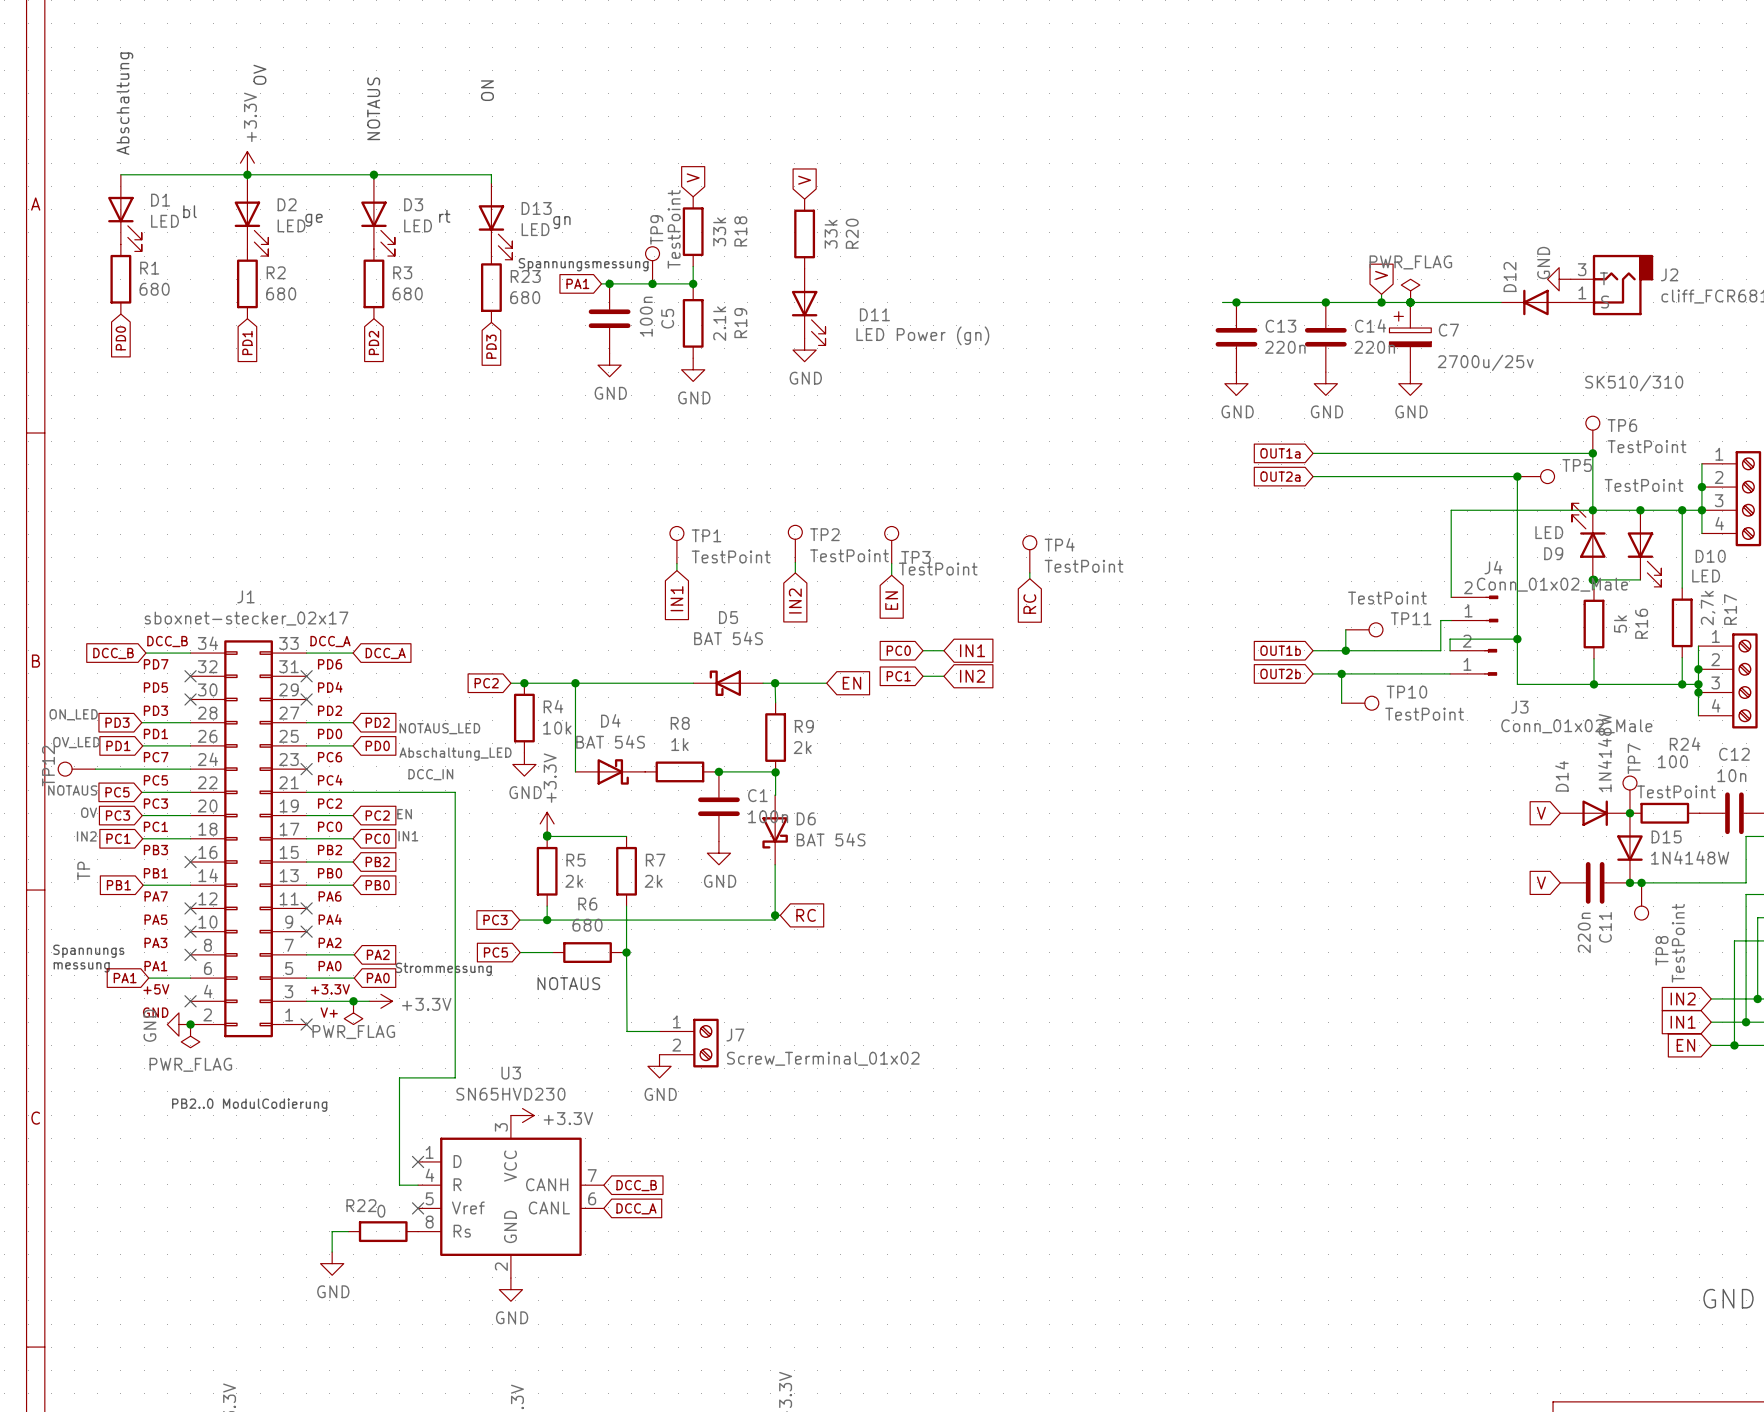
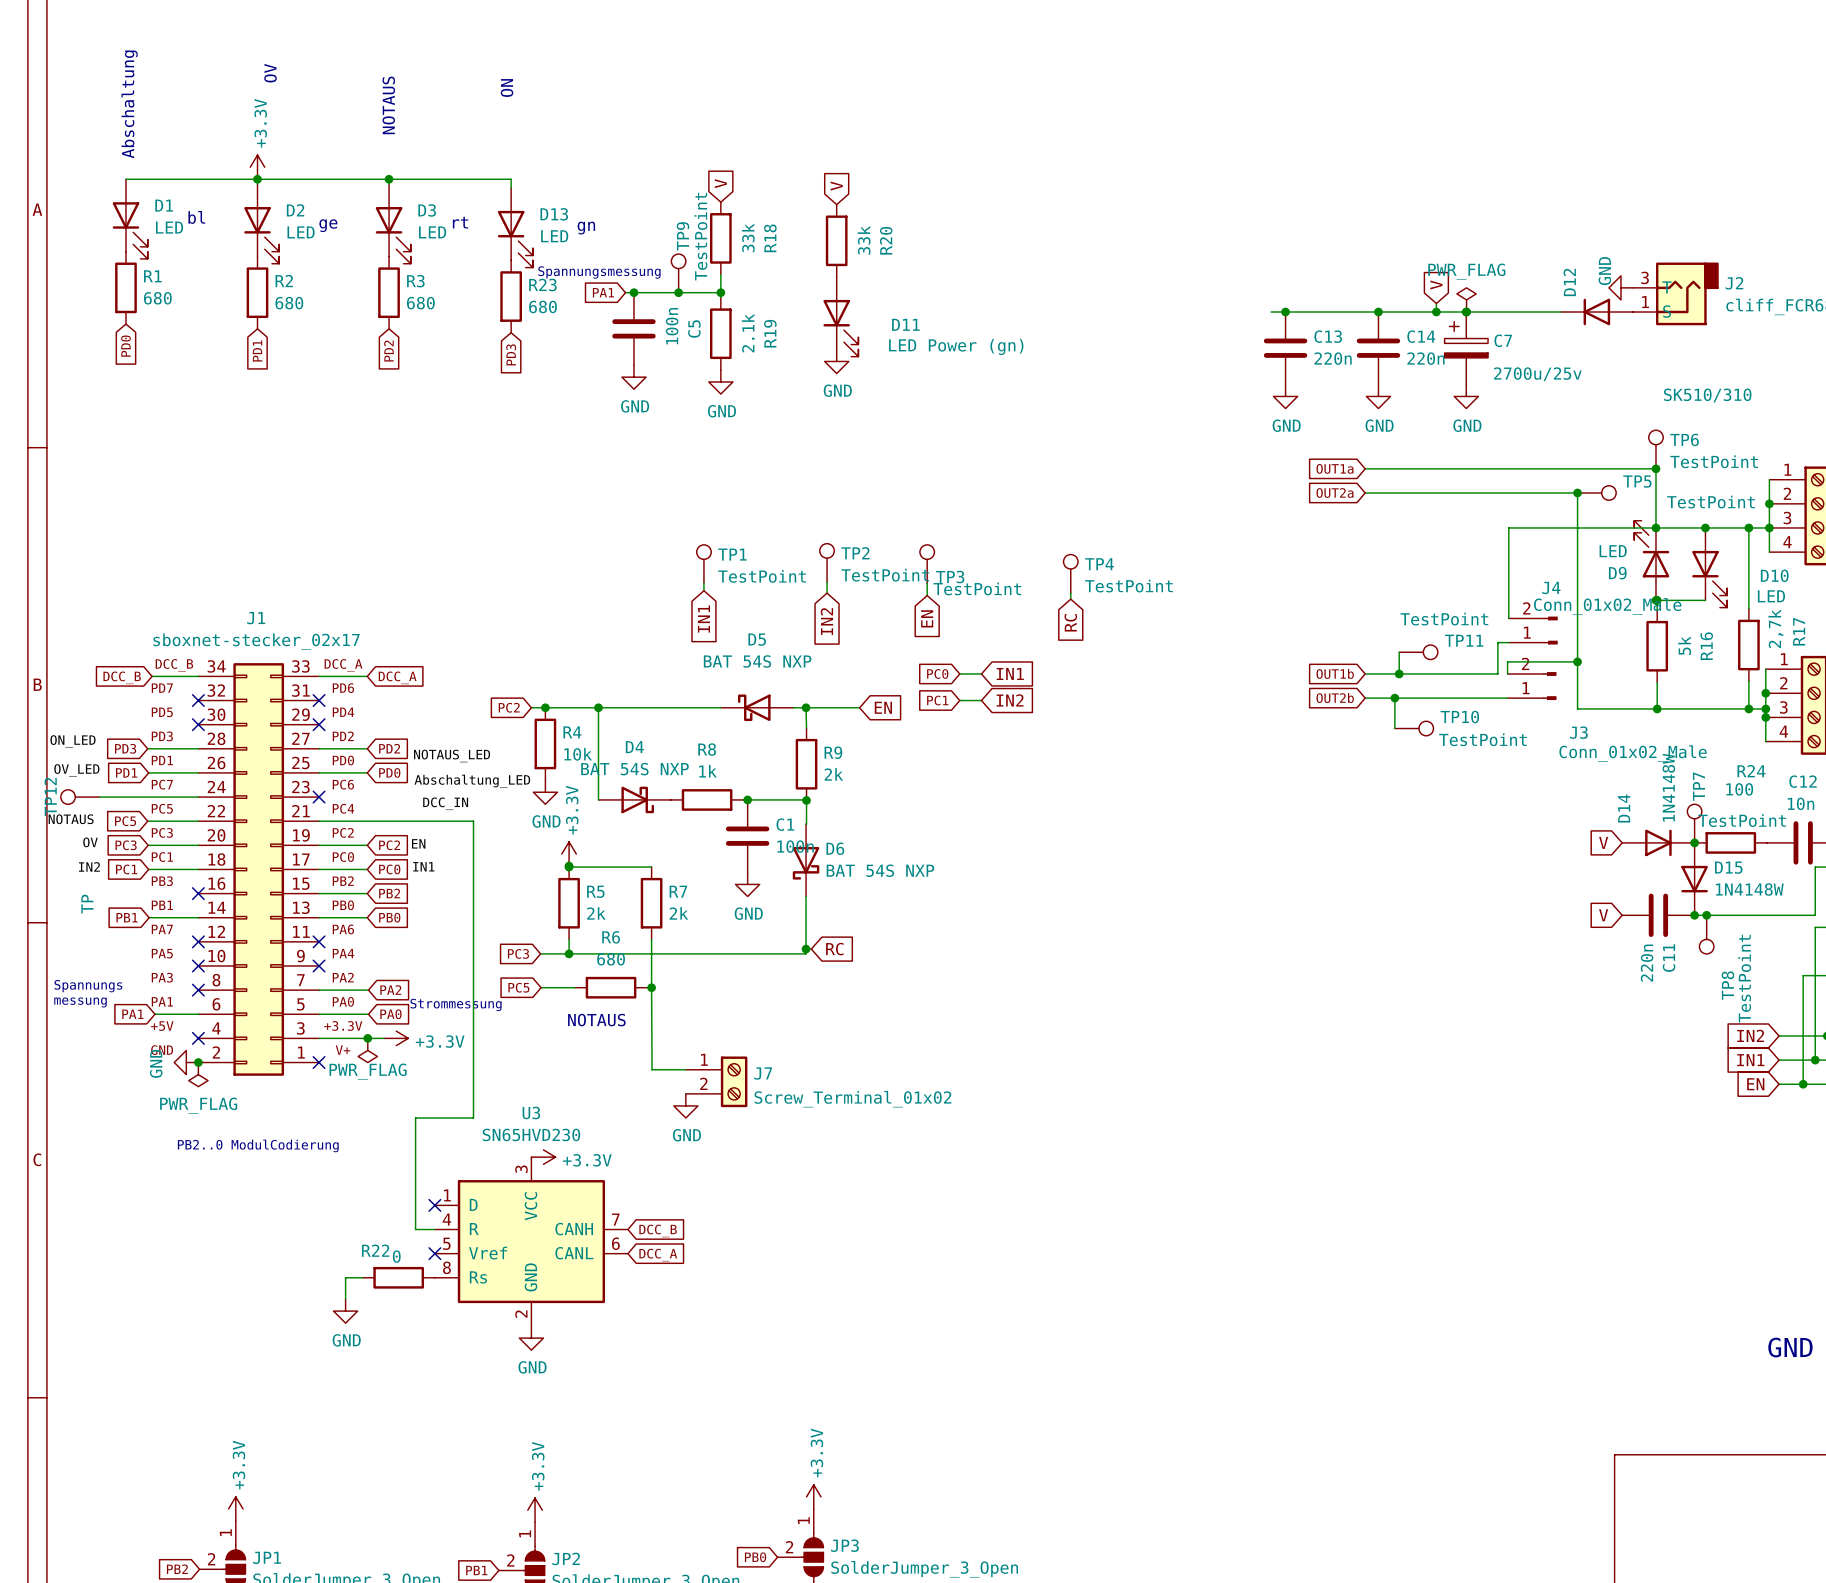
D5 value: BAT 54S (728, 638) -> BAT 54S NXP (757, 661)
D4 value: BAT 54S (610, 741) -> BAT 54S NXP (635, 769)
D6 value: BAT 54S (831, 839) -> BAT 54S NXP (880, 870)

